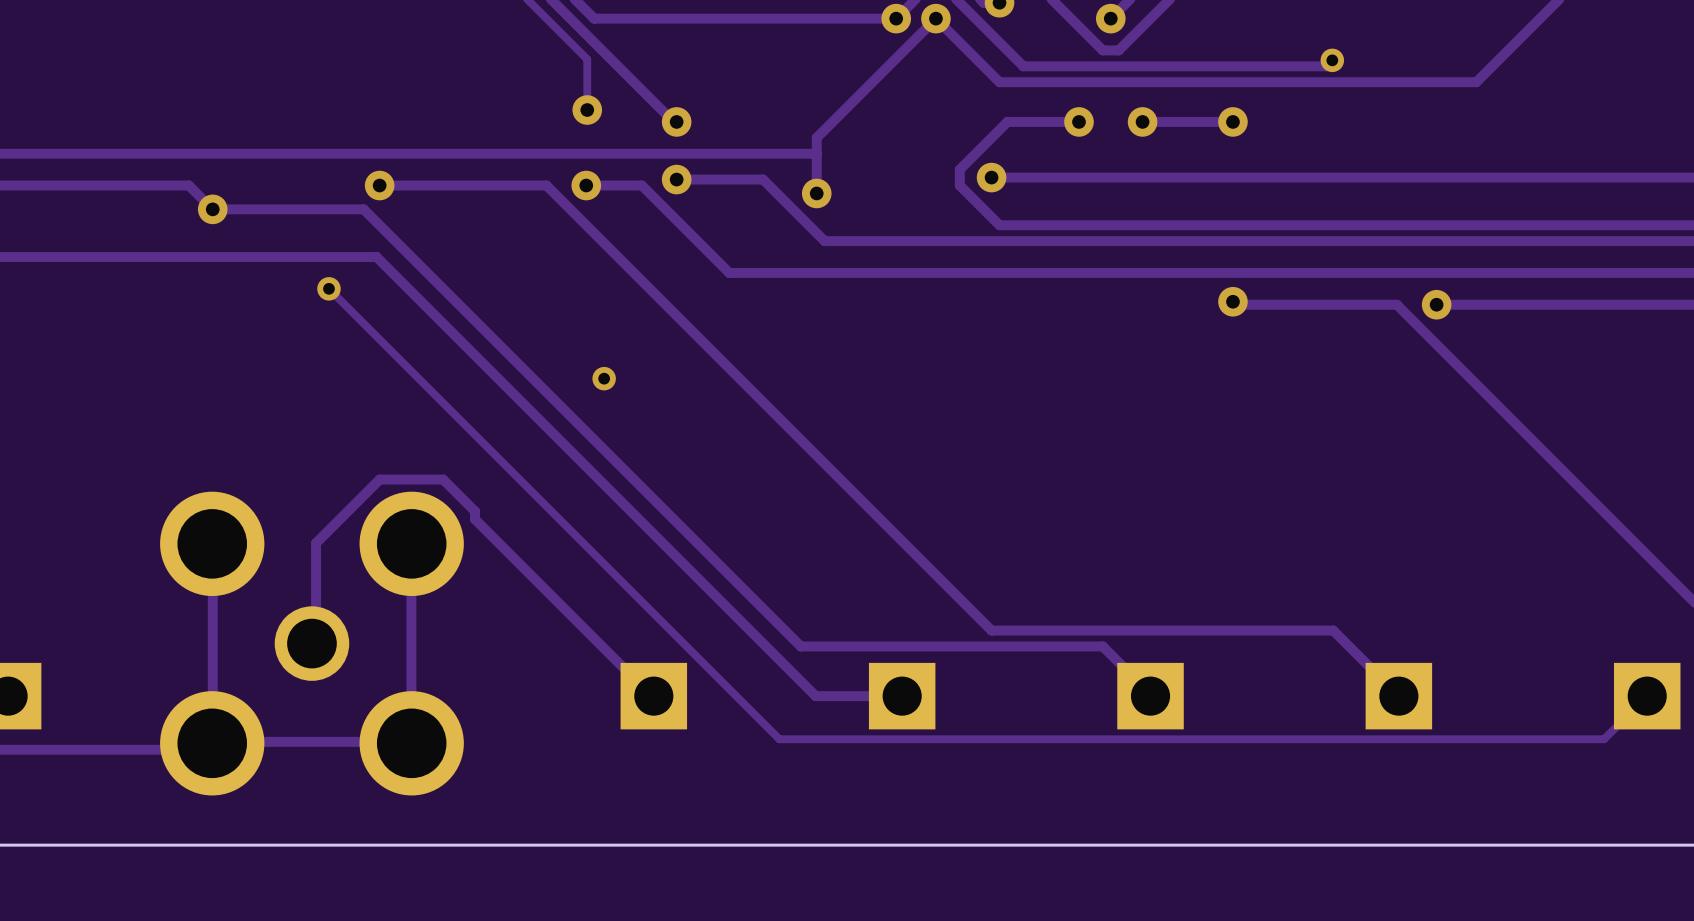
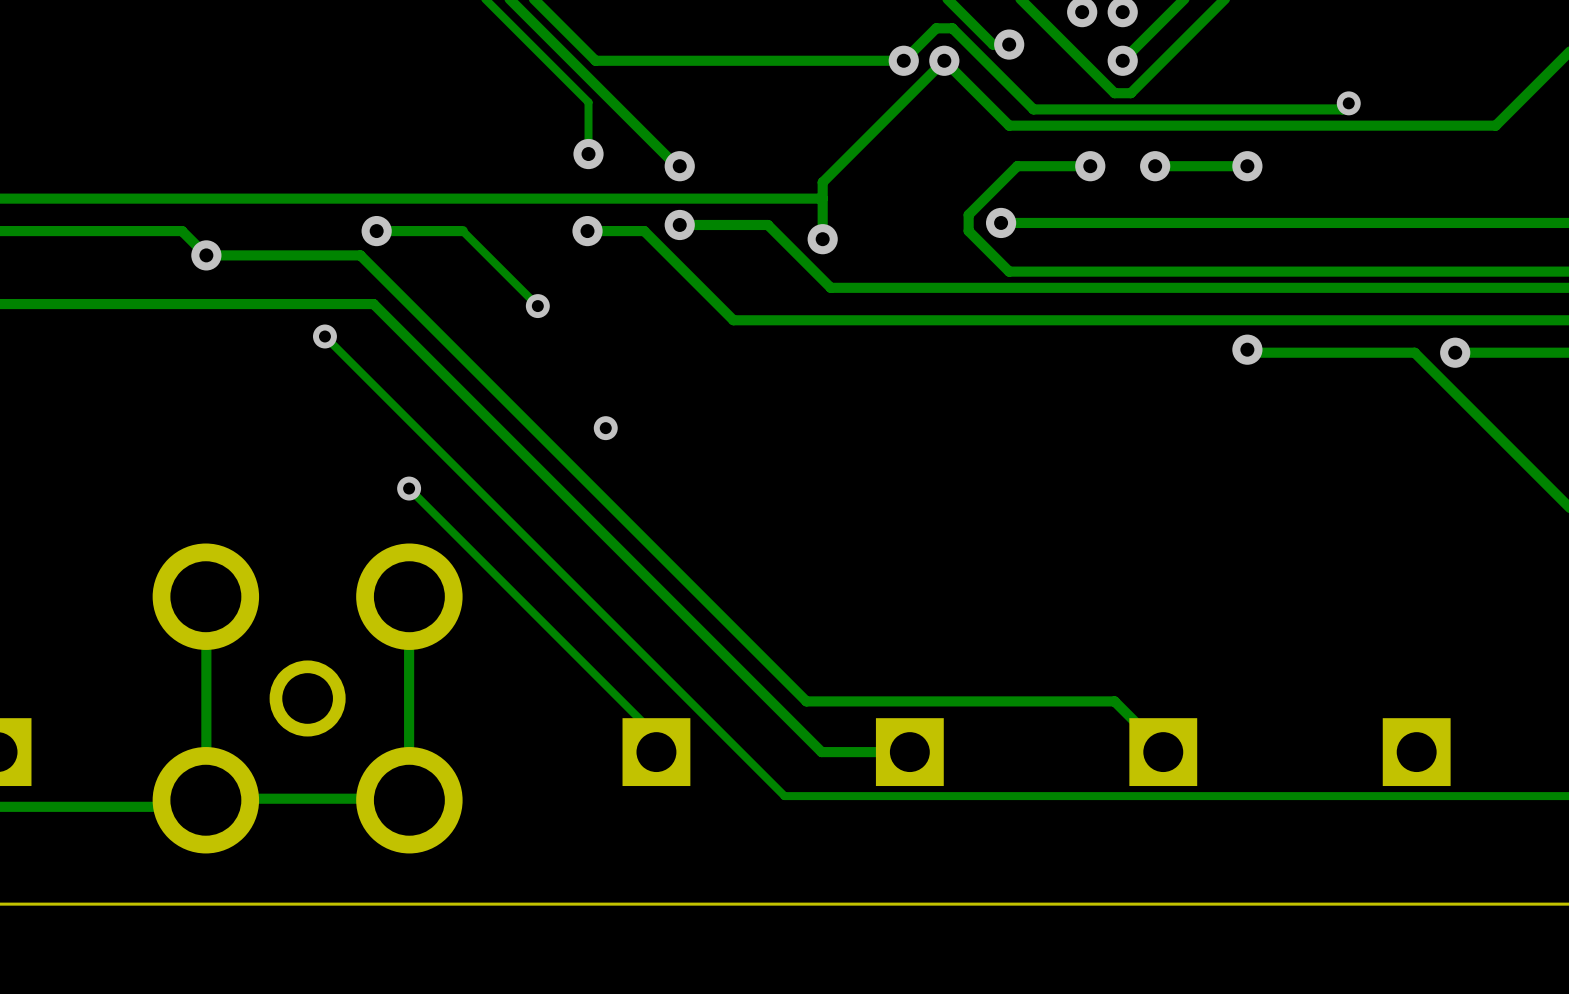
track: (464, 185) (546, 185) (991, 630) (1333, 630) (1398, 696) -> (462, 231) (537, 306)
via: none -> (537, 306)
via: none -> (409, 488)
track: (311, 643) (316, 638) (316, 543) (379, 479) (443, 479) (475, 511) (475, 519) (653, 696) -> (409, 488) (656, 735) (656, 752)

